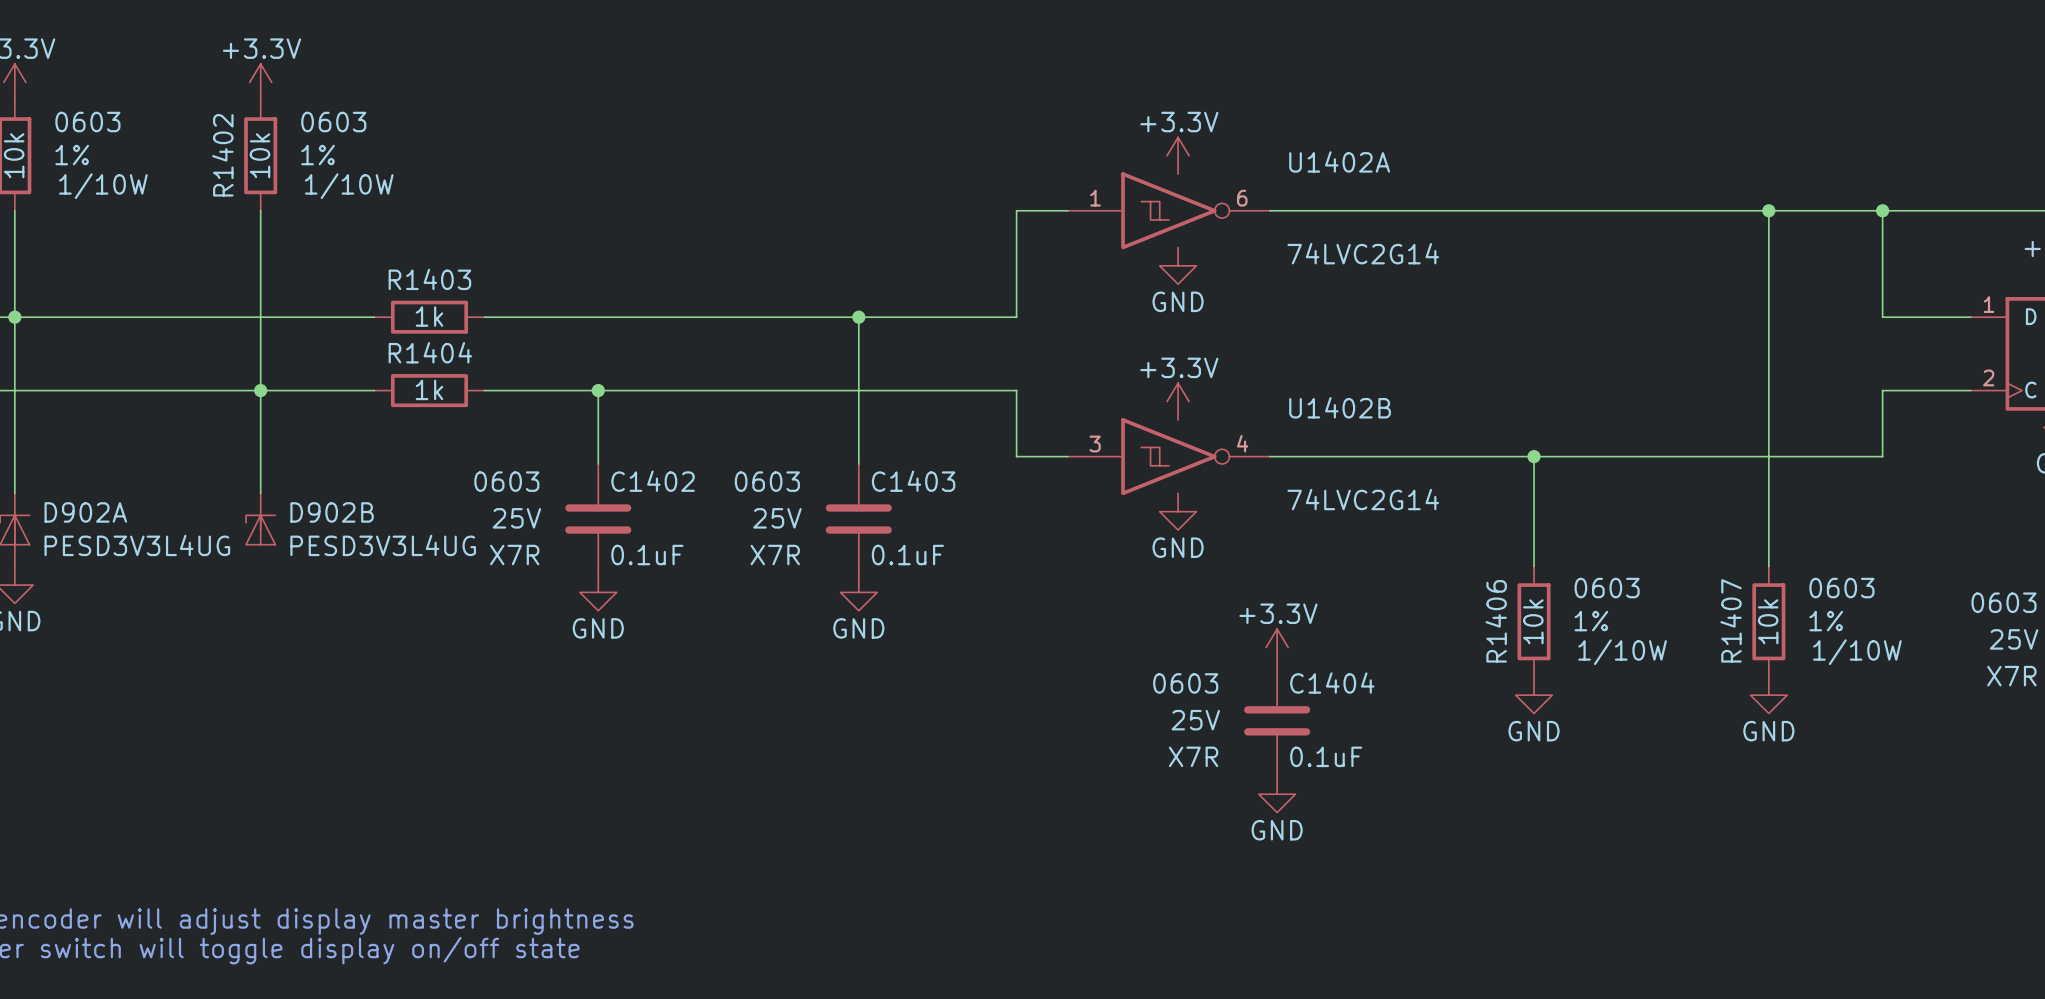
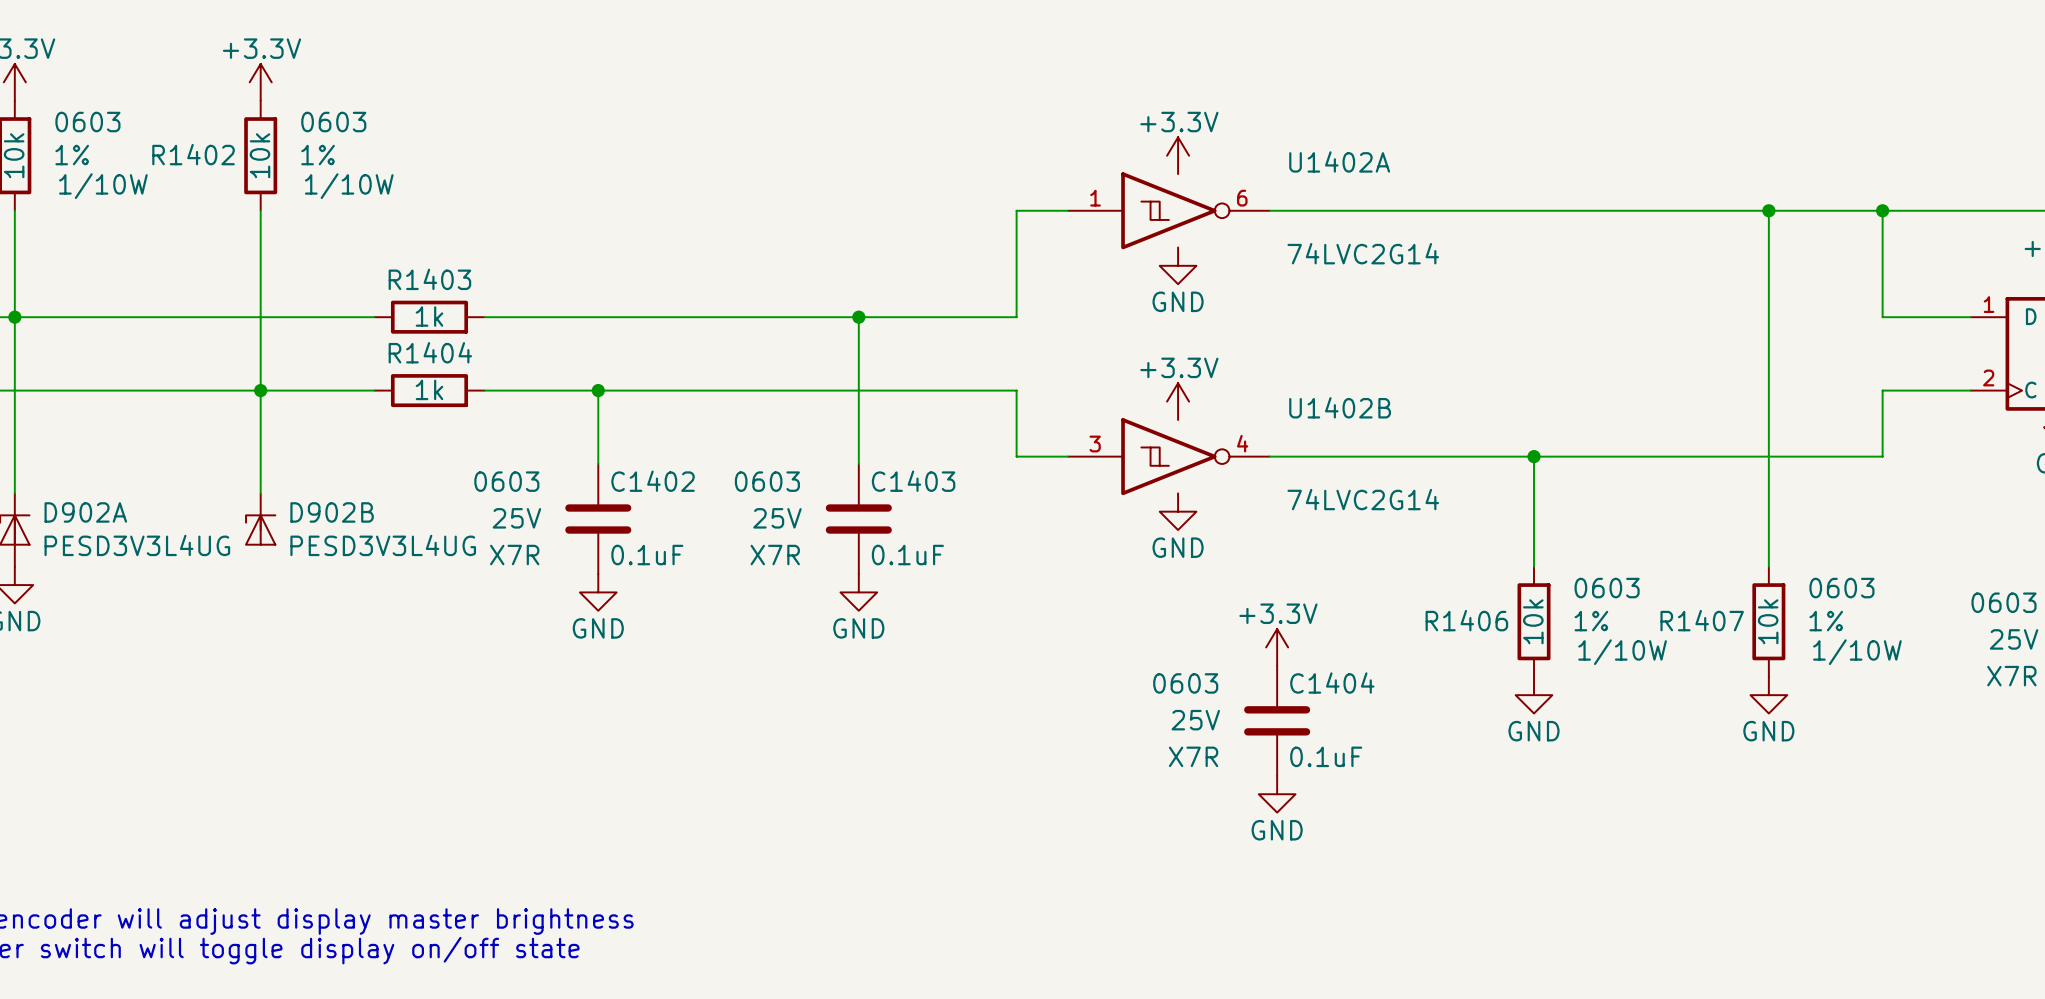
R1402 name rotation: 0° (222, 155) -> 90° clockwise (193, 154)
R1407 name rotation: 0° (1731, 620) -> 90° clockwise (1702, 620)
R1406 name rotation: 0° (1496, 621) -> 90° clockwise (1466, 620)

